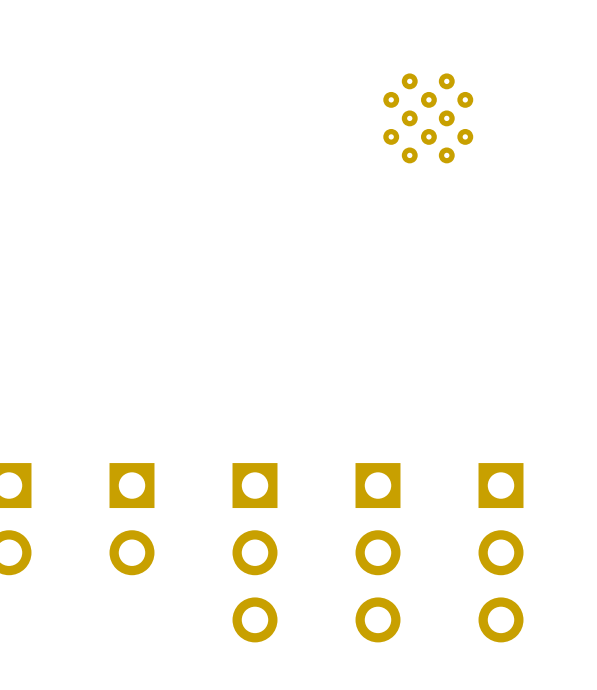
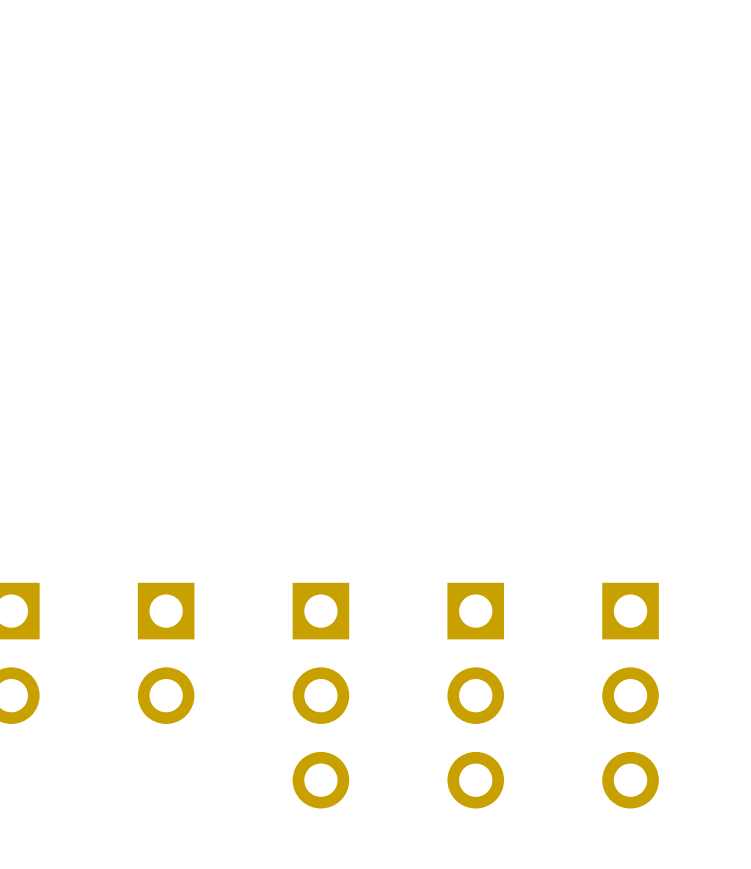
part: (428, 118) -> none

